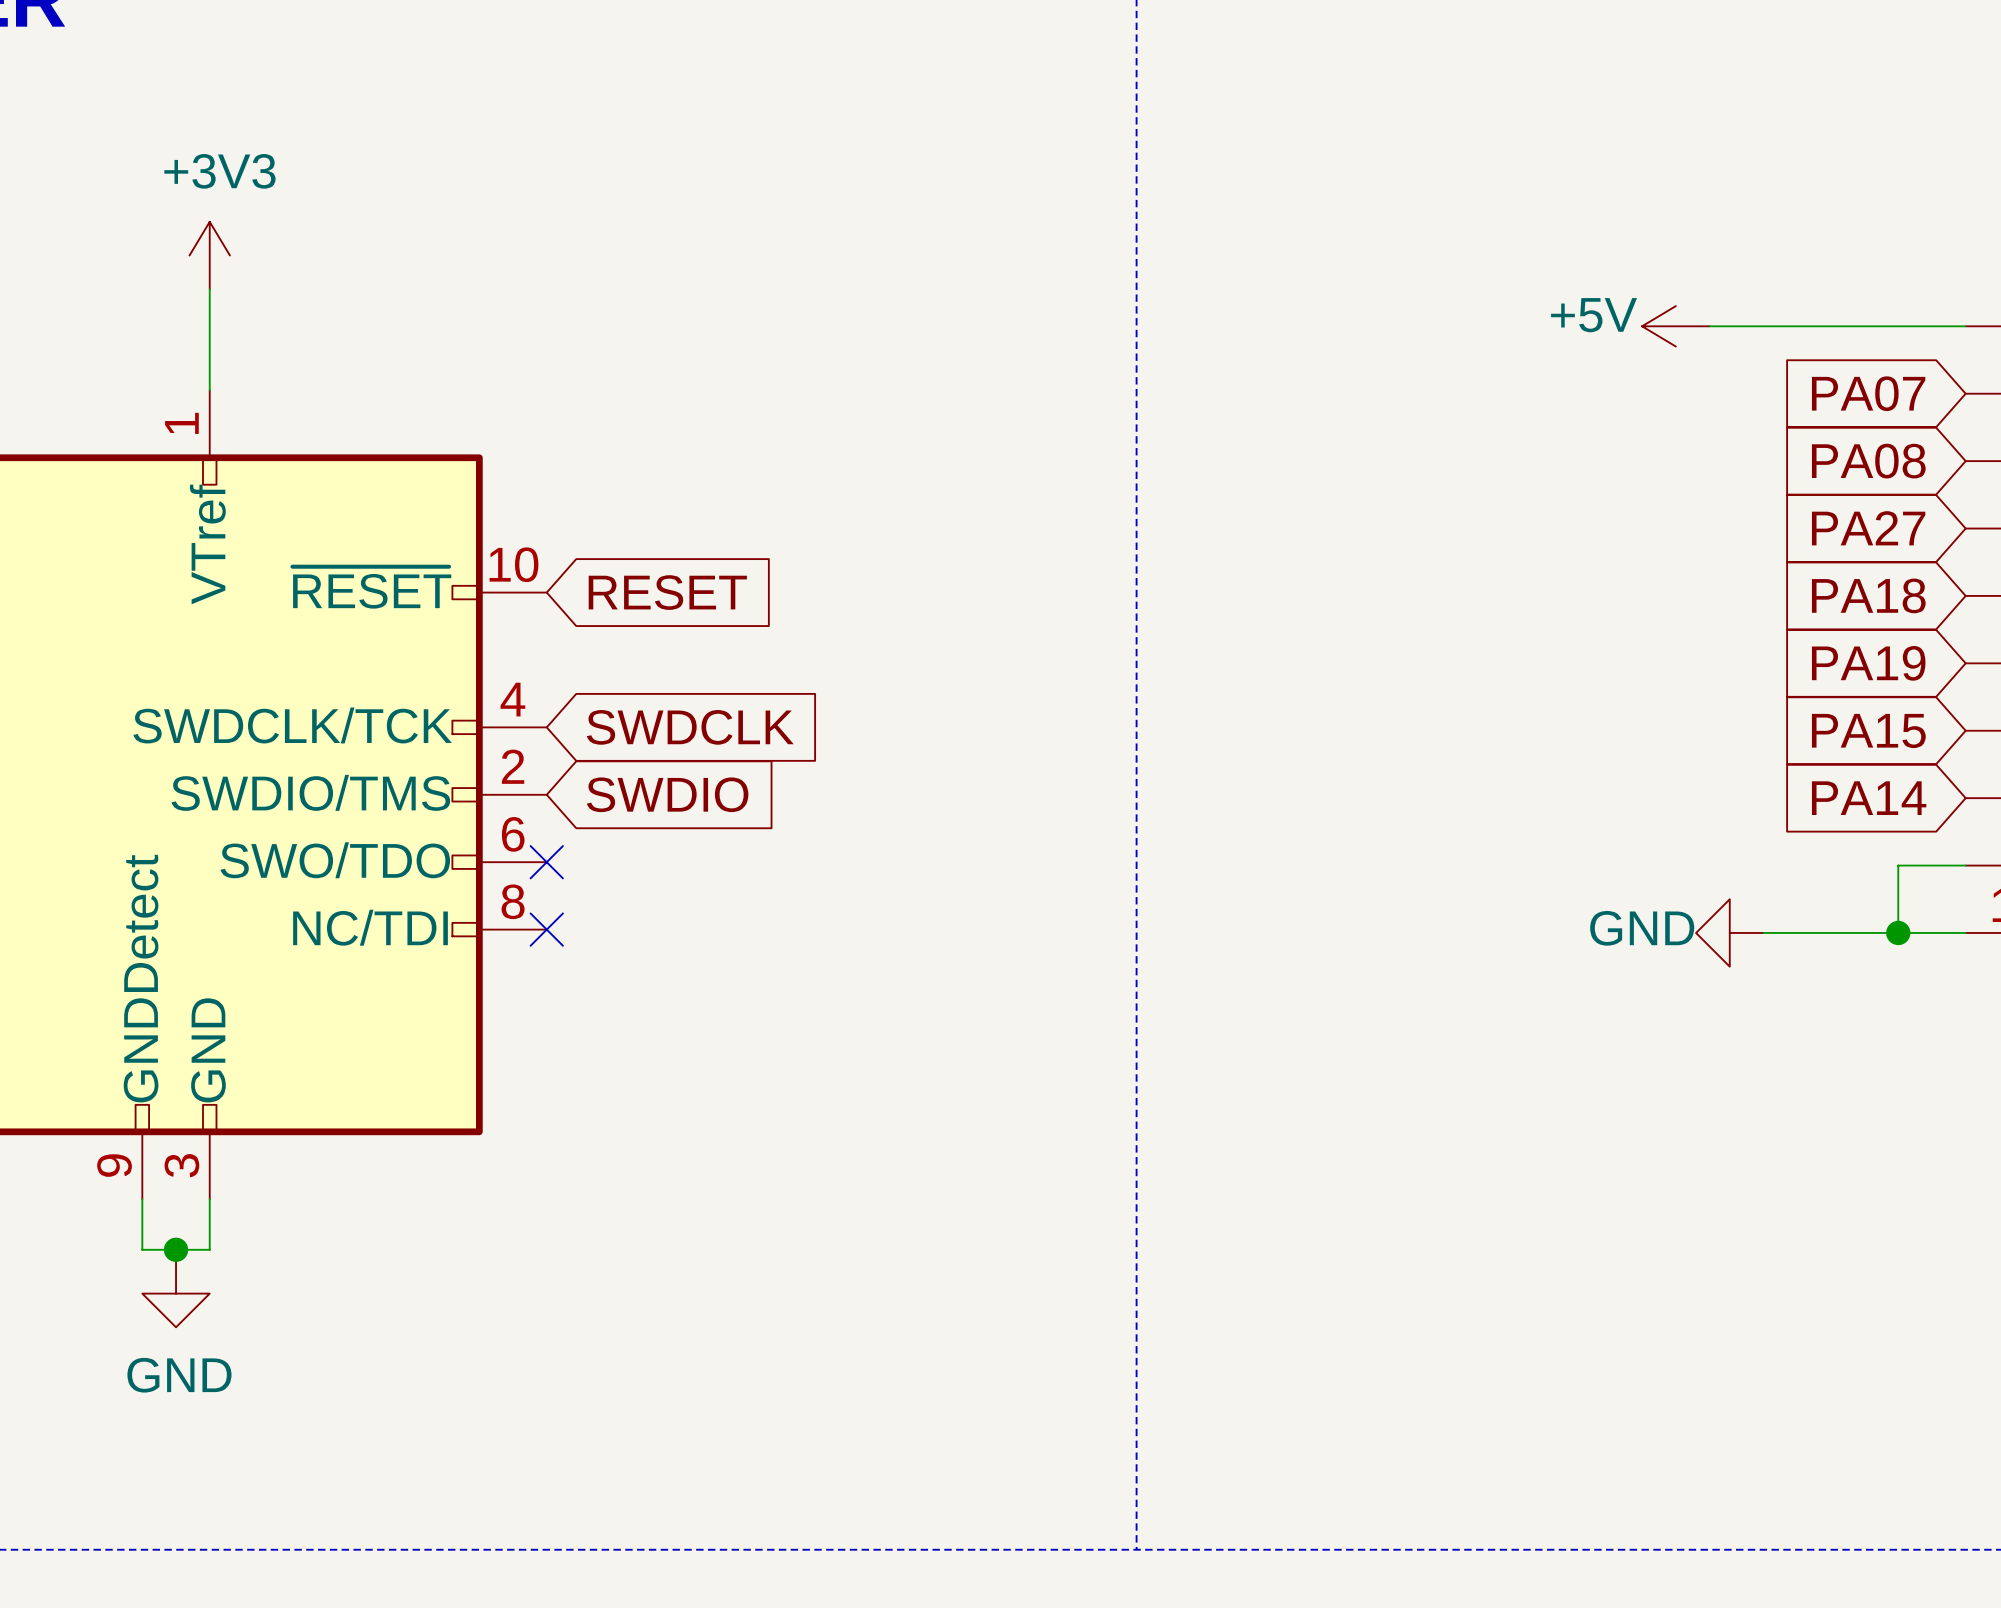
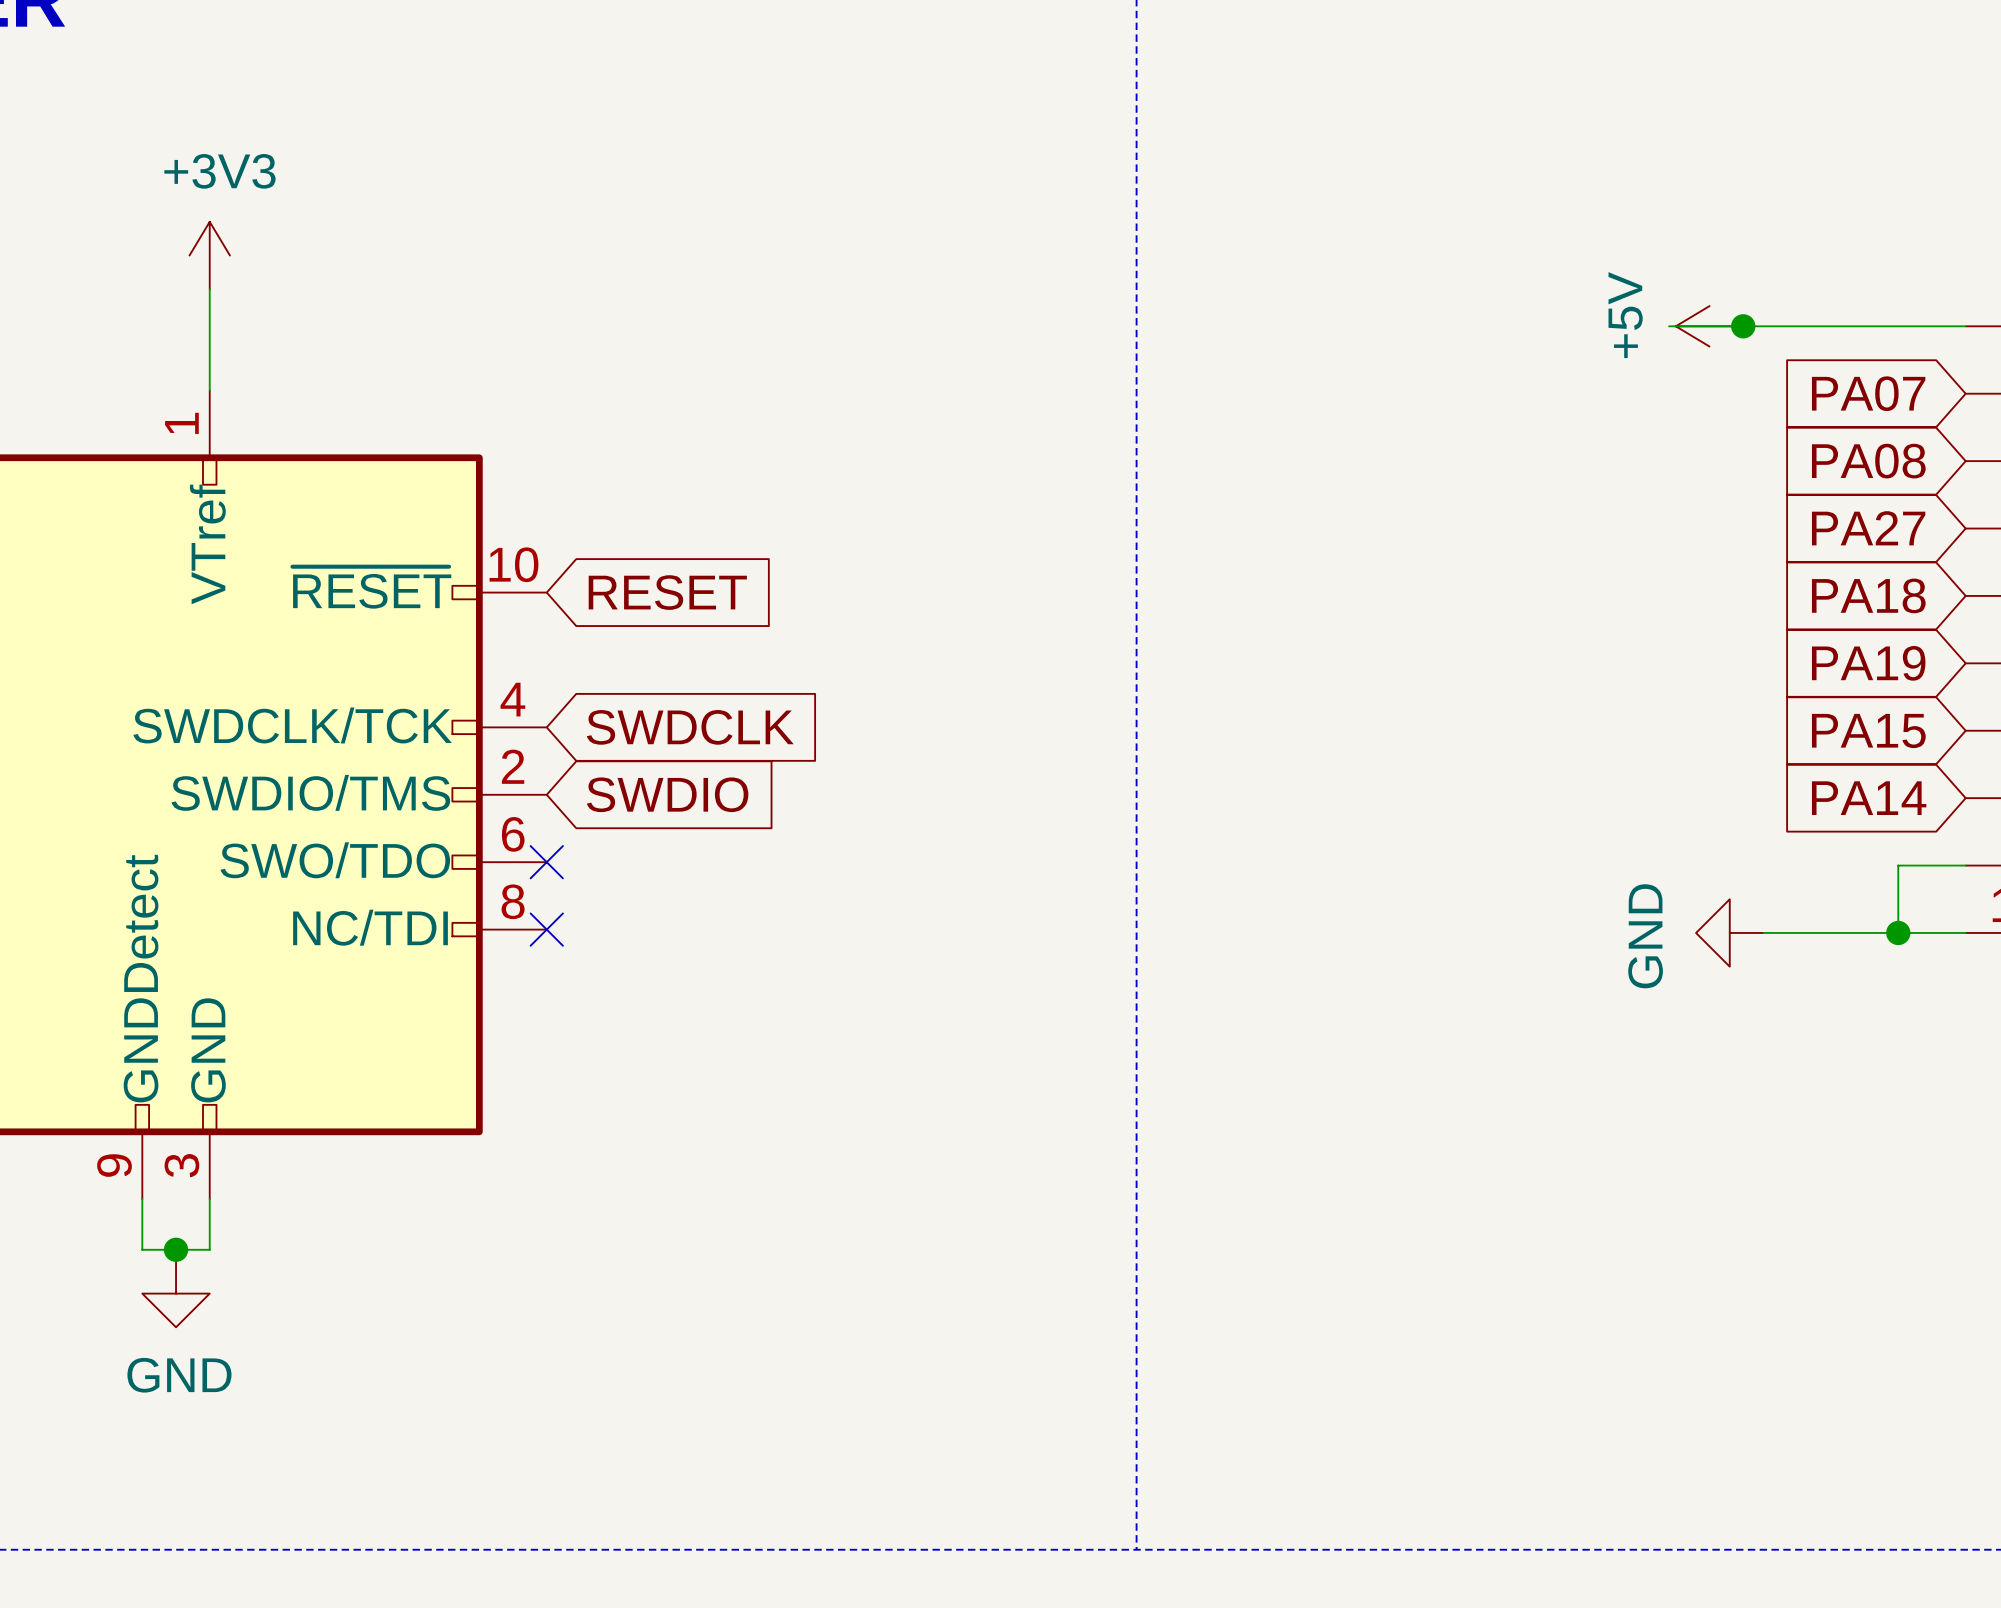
power symbol text rotation: 0° (1594, 315) -> 90° counterclockwise (1625, 315)
power symbol position: +5V (1675, 326) -> +5V (1709, 326)
junction: none -> (1743, 326)
power symbol text rotation: 0° (1642, 928) -> 90° counterclockwise (1645, 936)

